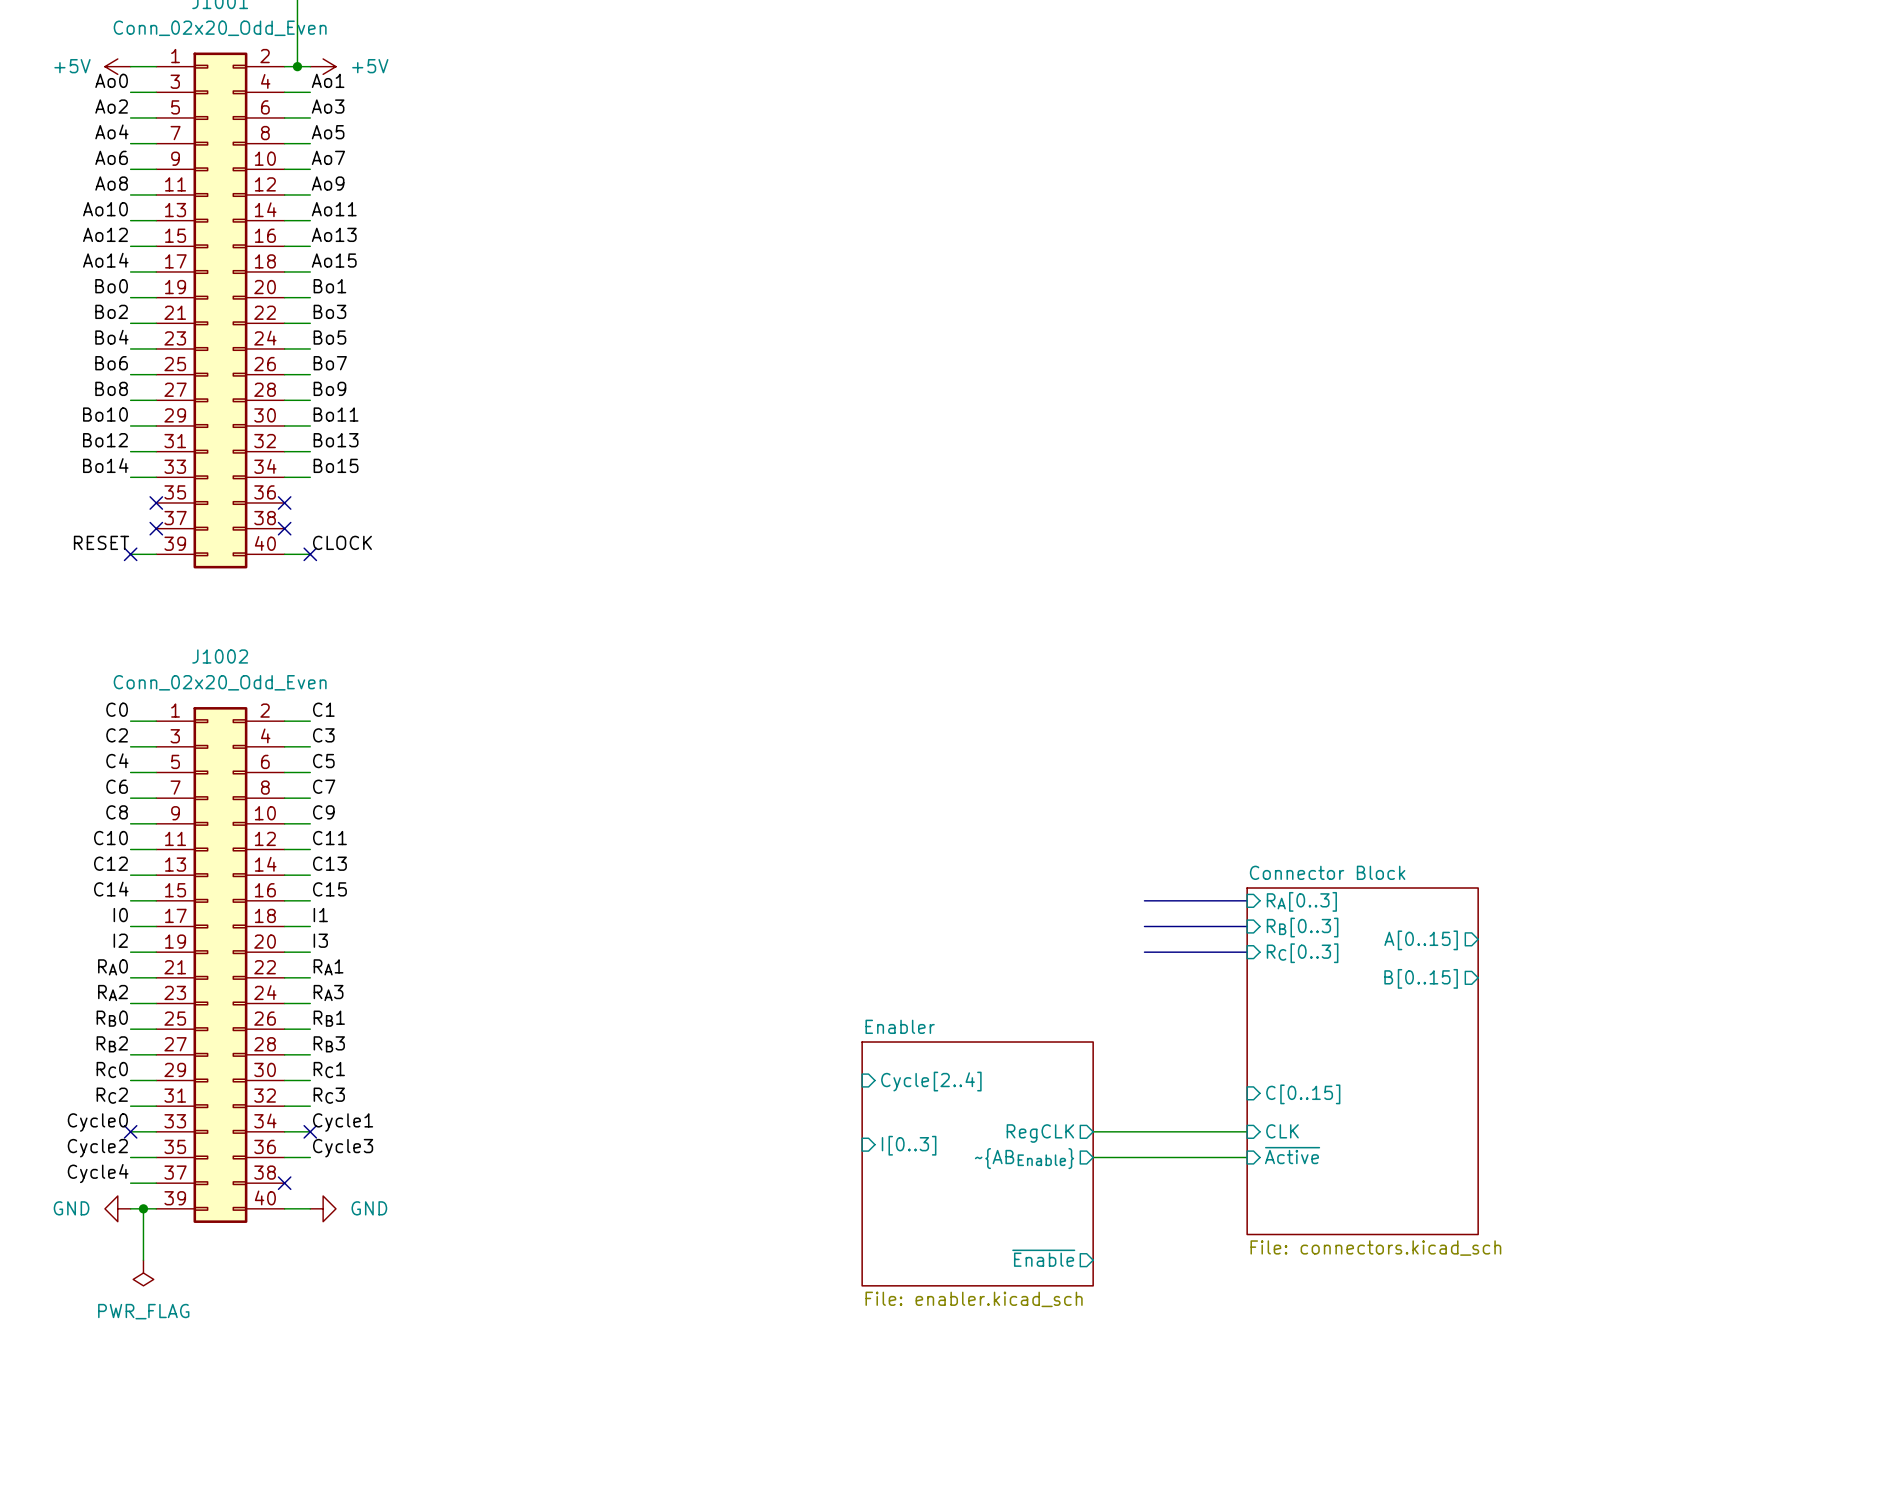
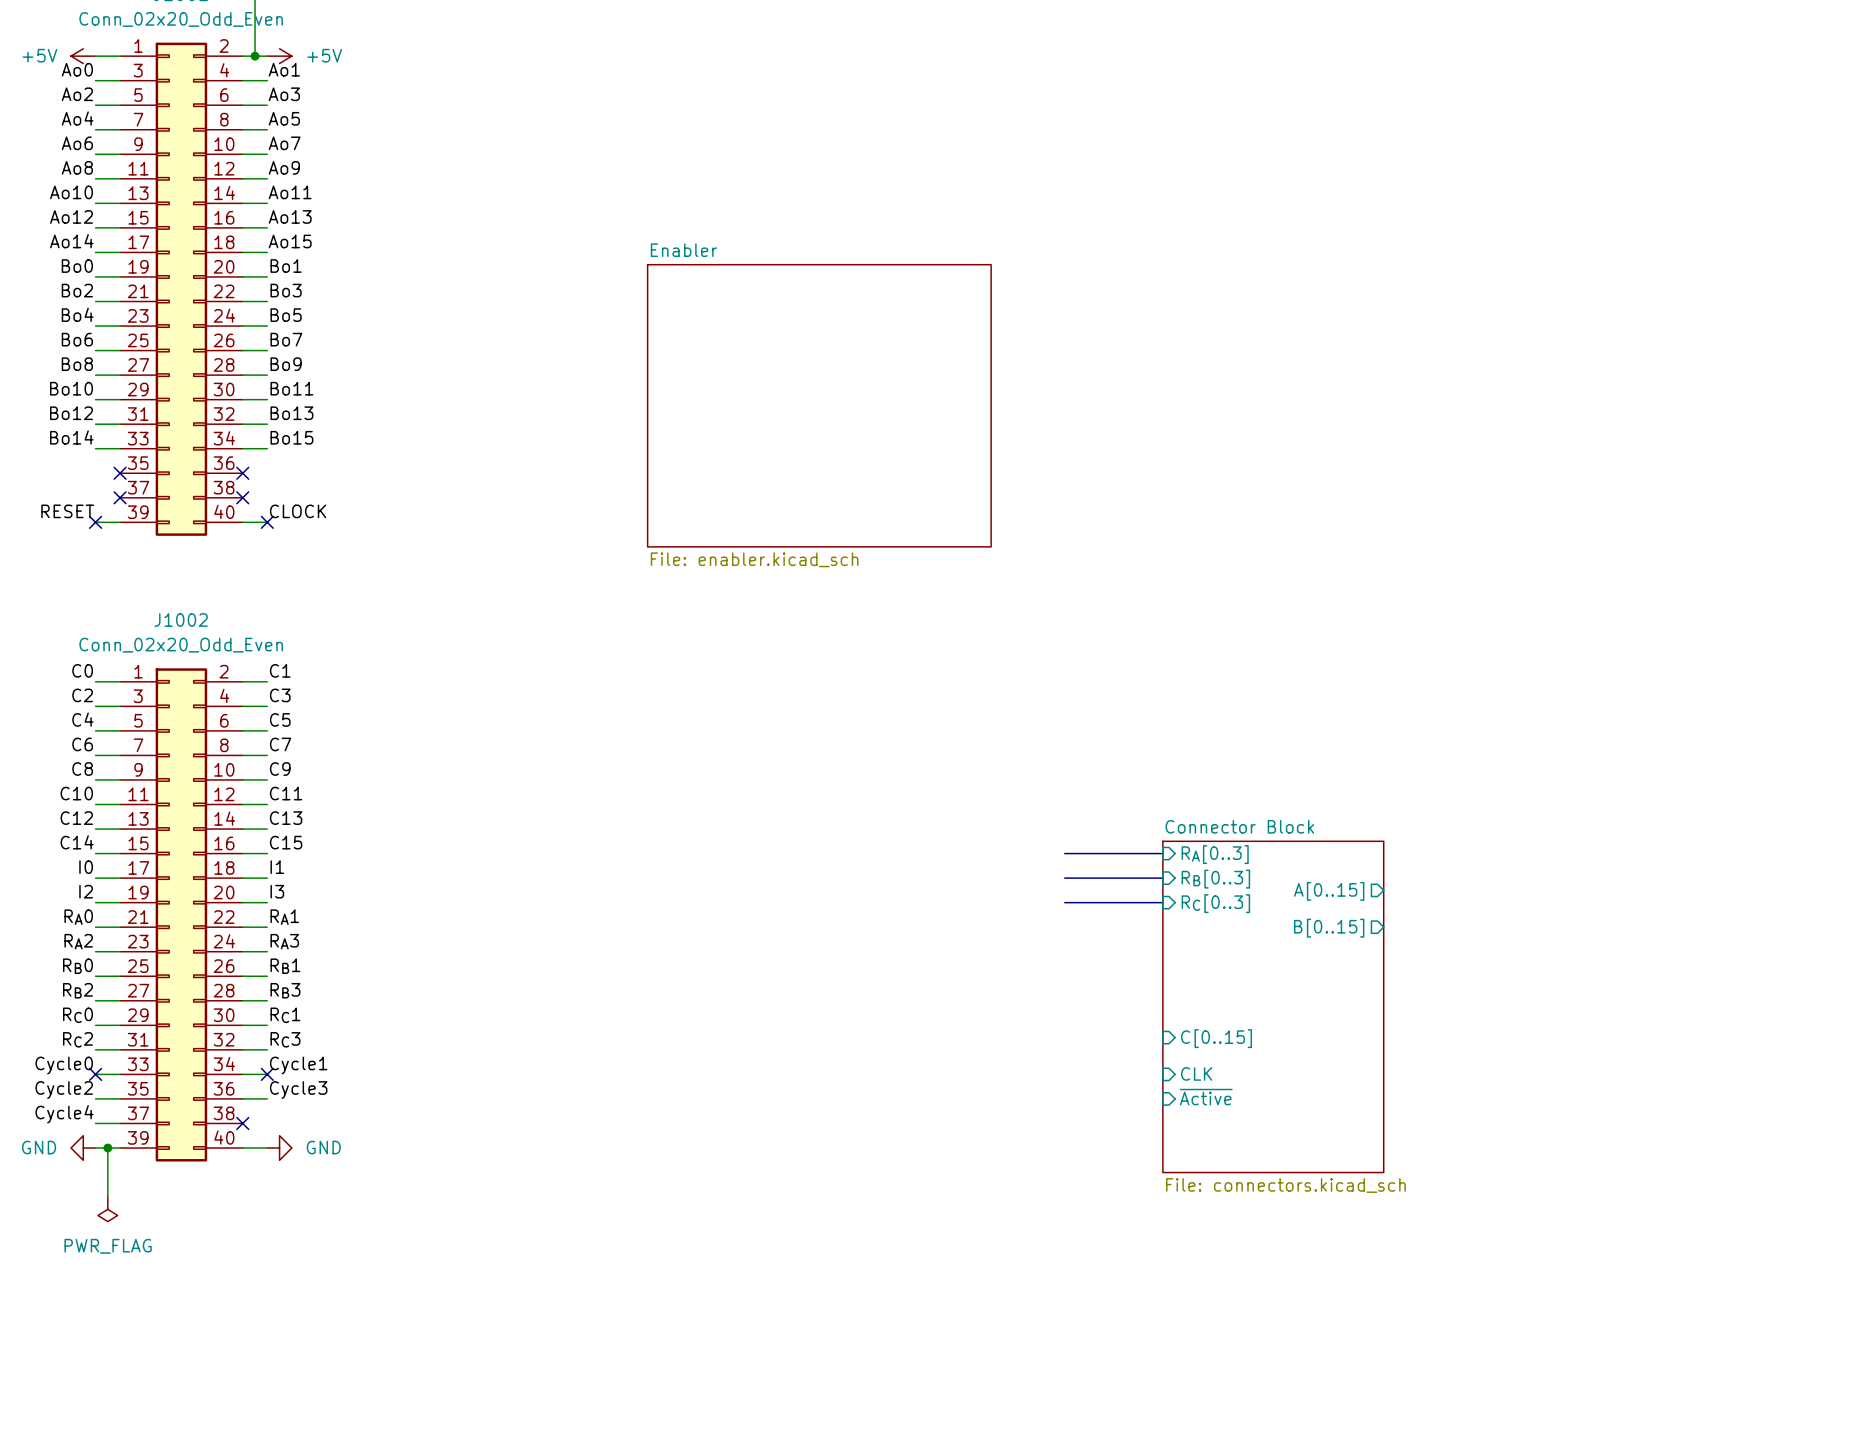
sheet Enabler: none -> File: enabler.kicad_sch (819, 405)
sheet pin: Cycle[2..4] (931, 1081) -> none
wire: (1093, 1131) (1247, 1131) -> none
sheet pin: RegCLK (1040, 1133) -> none
sheet pin: I[0..3] (909, 1145) -> none
wire: (1093, 1157) (1247, 1157) -> none
sheet pin: ~{ABEnable} (1024, 1158) -> none
sheet Enabler: File: enabler.kicad_sch (977, 1163) -> none
sheet pin: ~{Enable} (1043, 1258) -> none

